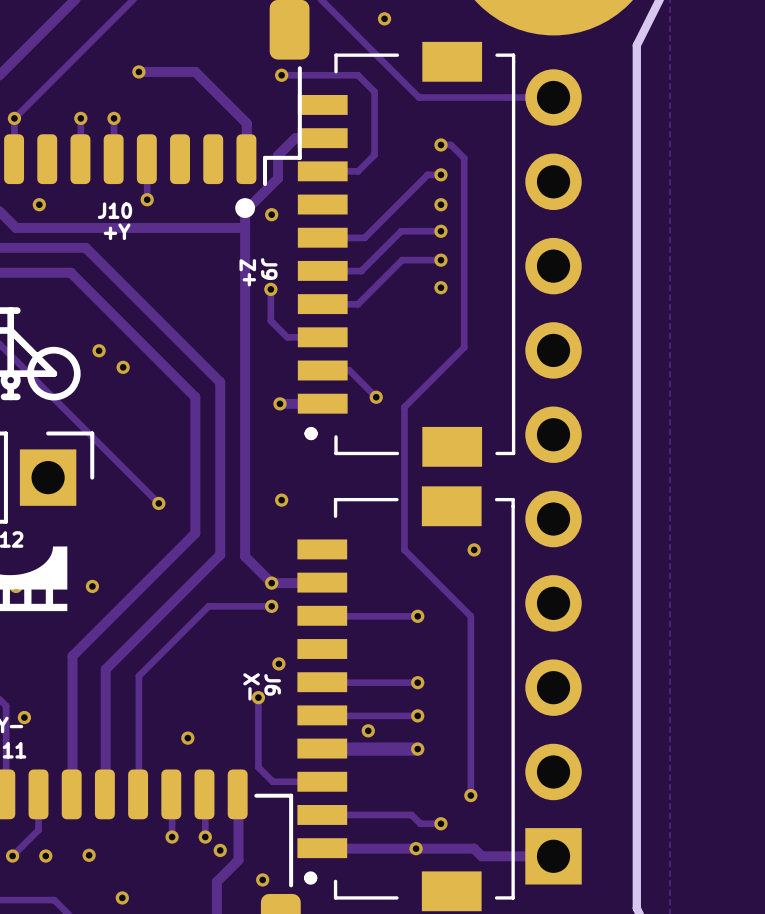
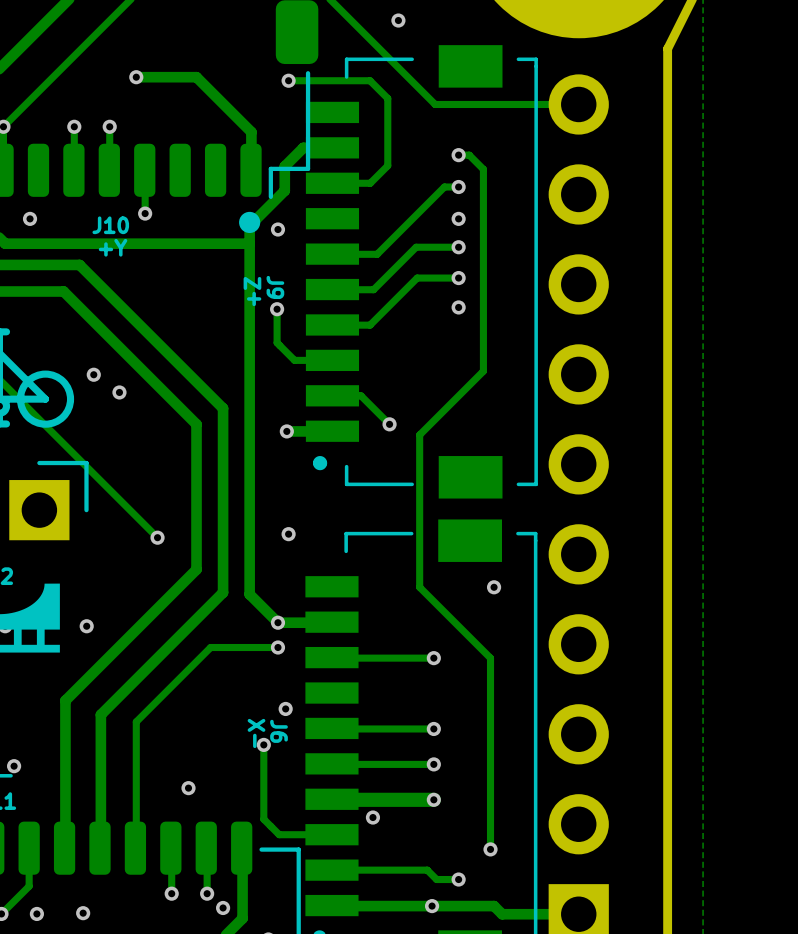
via position: (368, 730) -> (372, 817)

